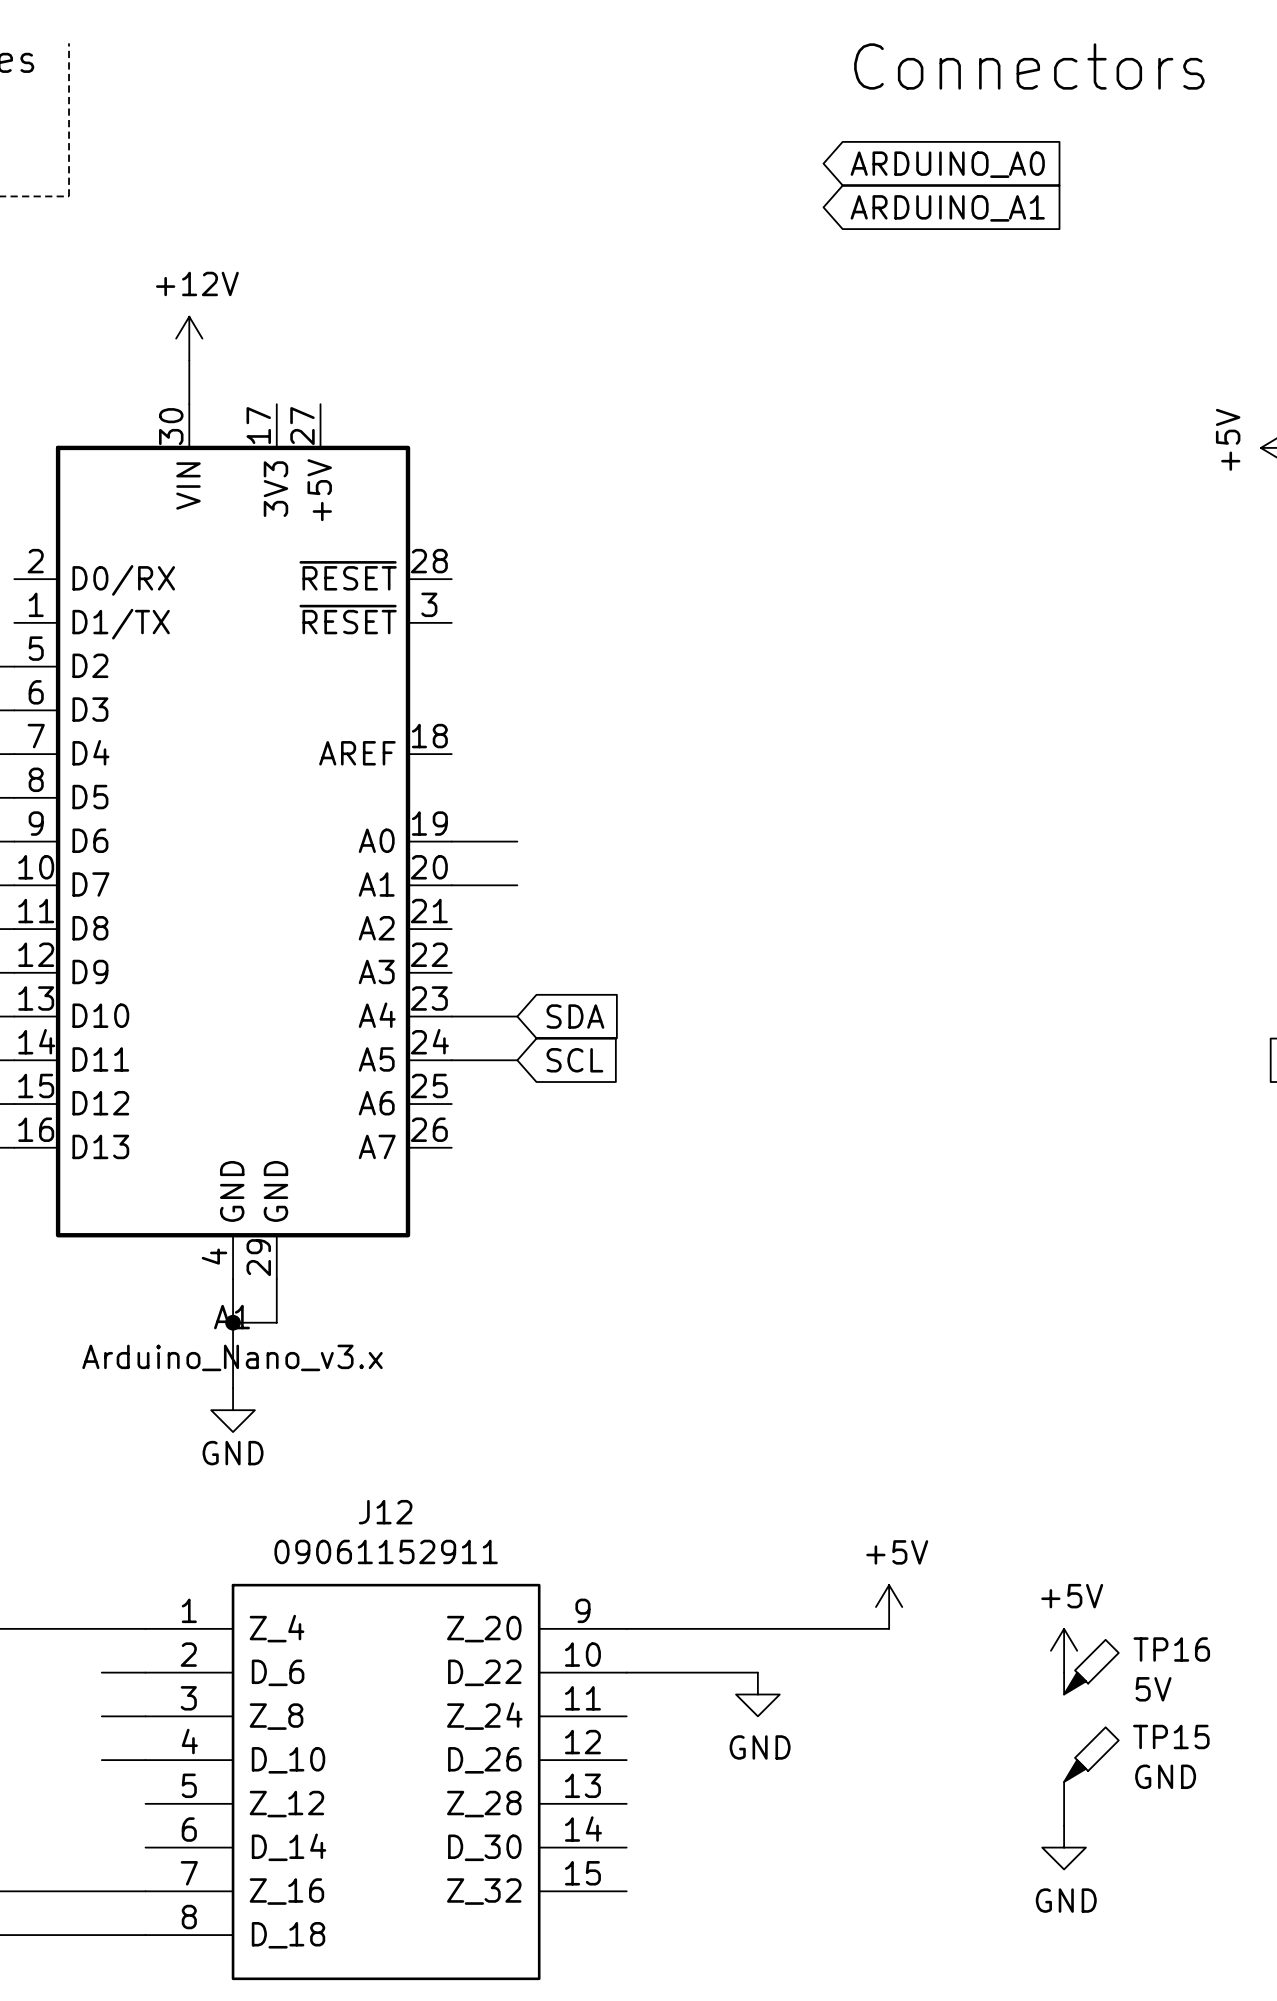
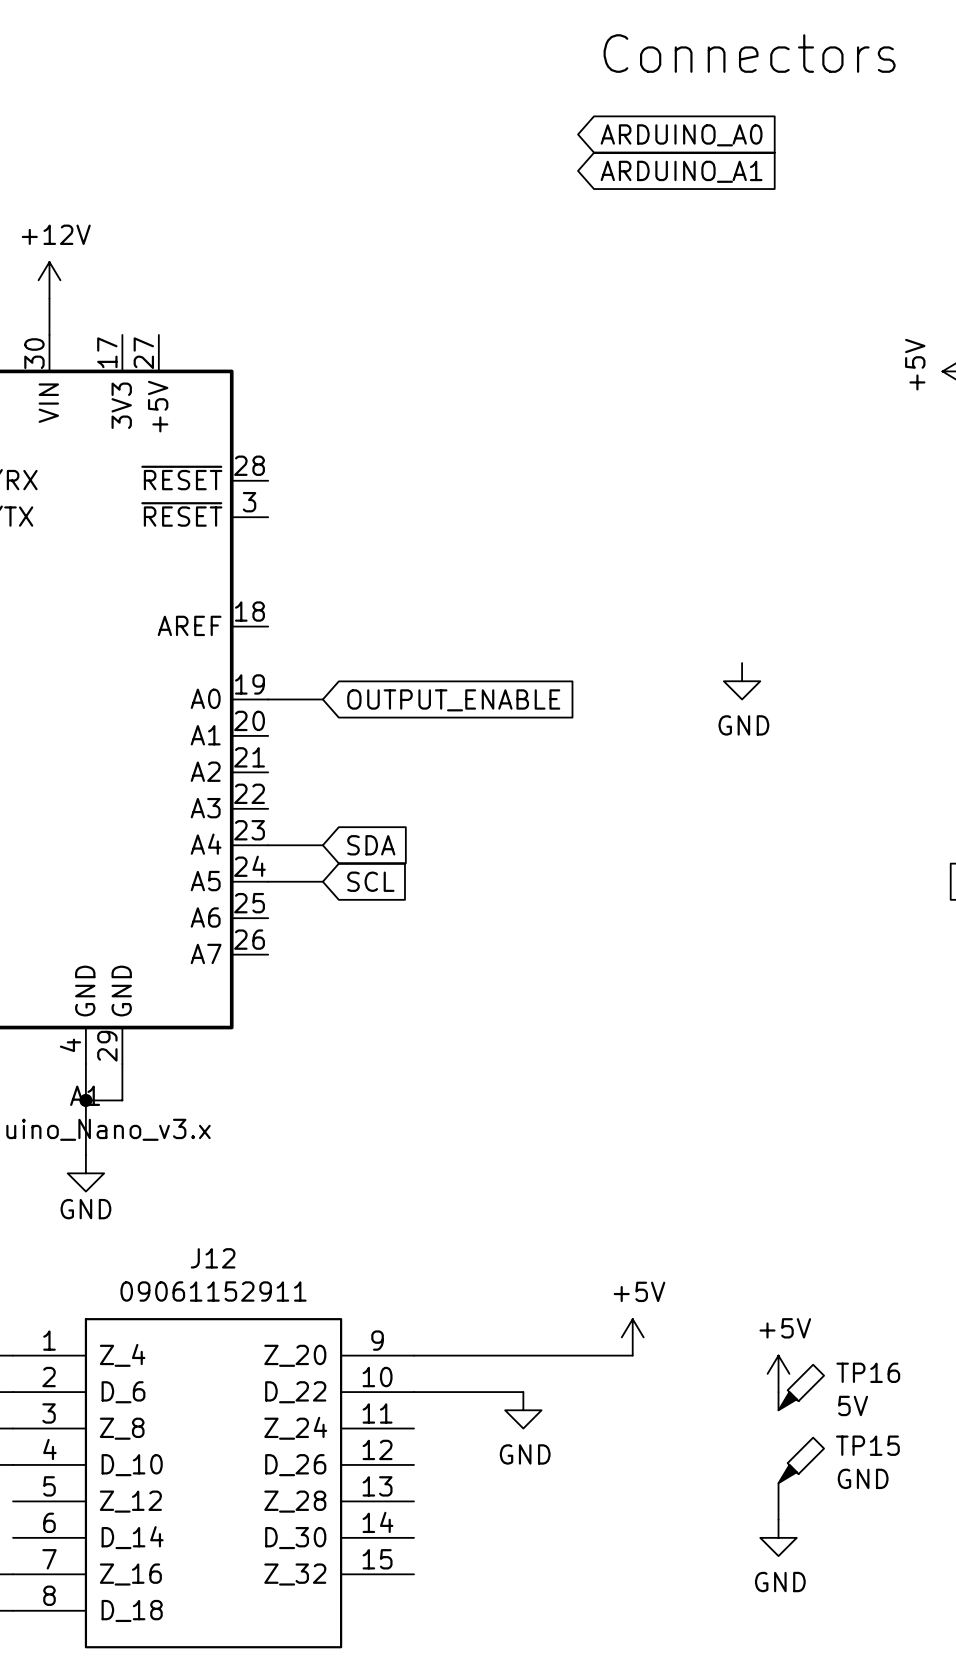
power symbol: none -> GND (742, 681)
global label: none -> OUTPUT_ENABLE (453, 700)
wire: (451, 885) (517, 885) -> none

